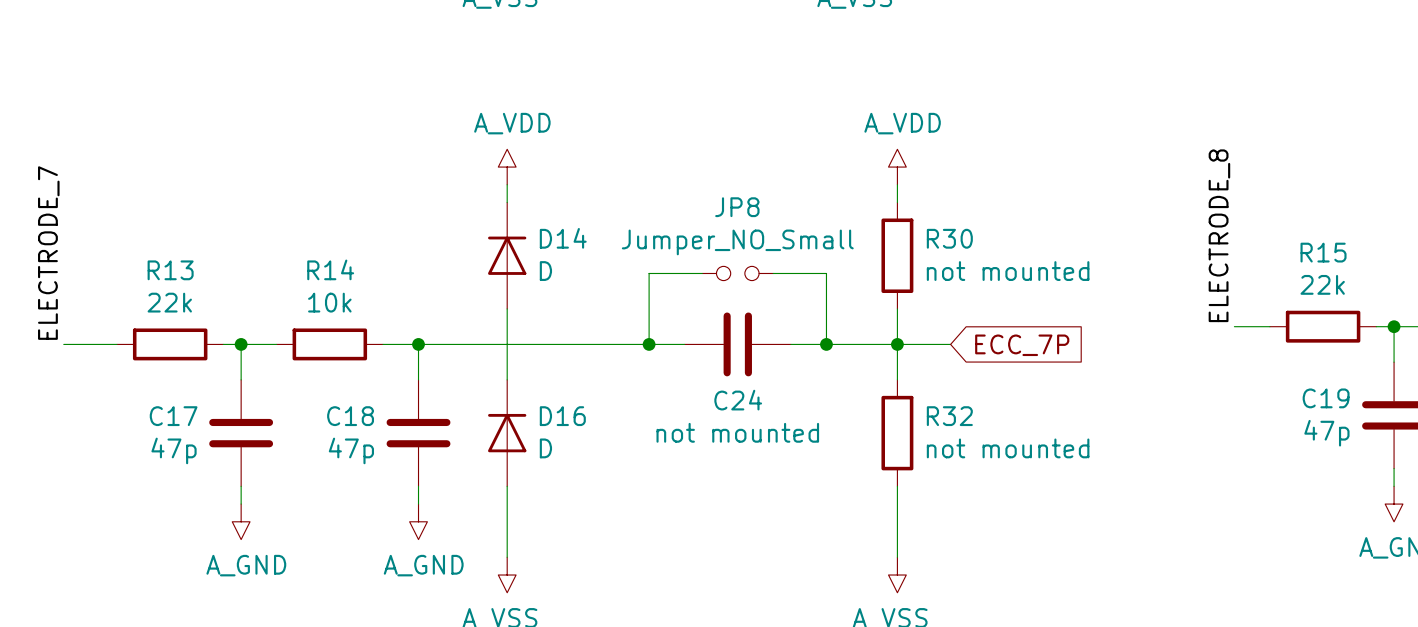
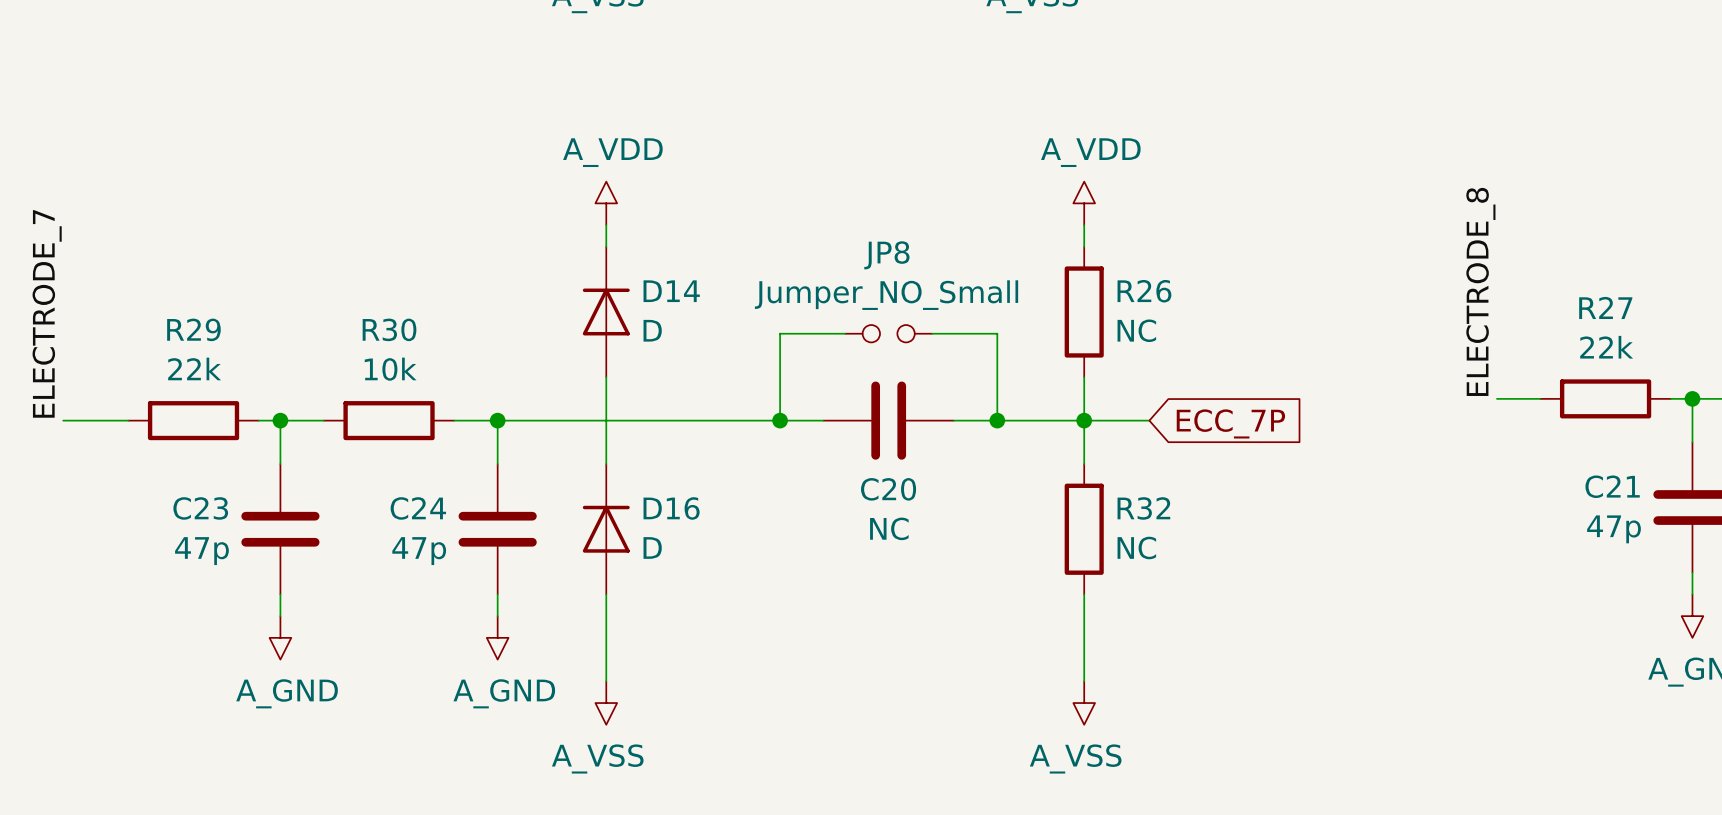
R30 name: R30 (949, 238) -> R26 (1144, 291)
R15 name: R15 (1323, 252) -> R27 (1605, 307)
R14 name: R14 (330, 269) -> R30 (389, 329)
R13 name: R13 (170, 270) -> R29 (193, 329)
R30 value: not mounted (1008, 271) -> NC (1136, 330)
C19 name: C19 (1326, 398) -> C21 (1612, 486)
C24 name: C24 (738, 400) -> C20 (888, 489)
C17 name: C17 (173, 416) -> C23 (200, 508)
C18 name: C18 (350, 416) -> C24 (418, 508)
C24 value: not mounted (737, 432) -> NC (889, 528)
R32 value: not mounted (1008, 448) -> NC (1136, 548)

